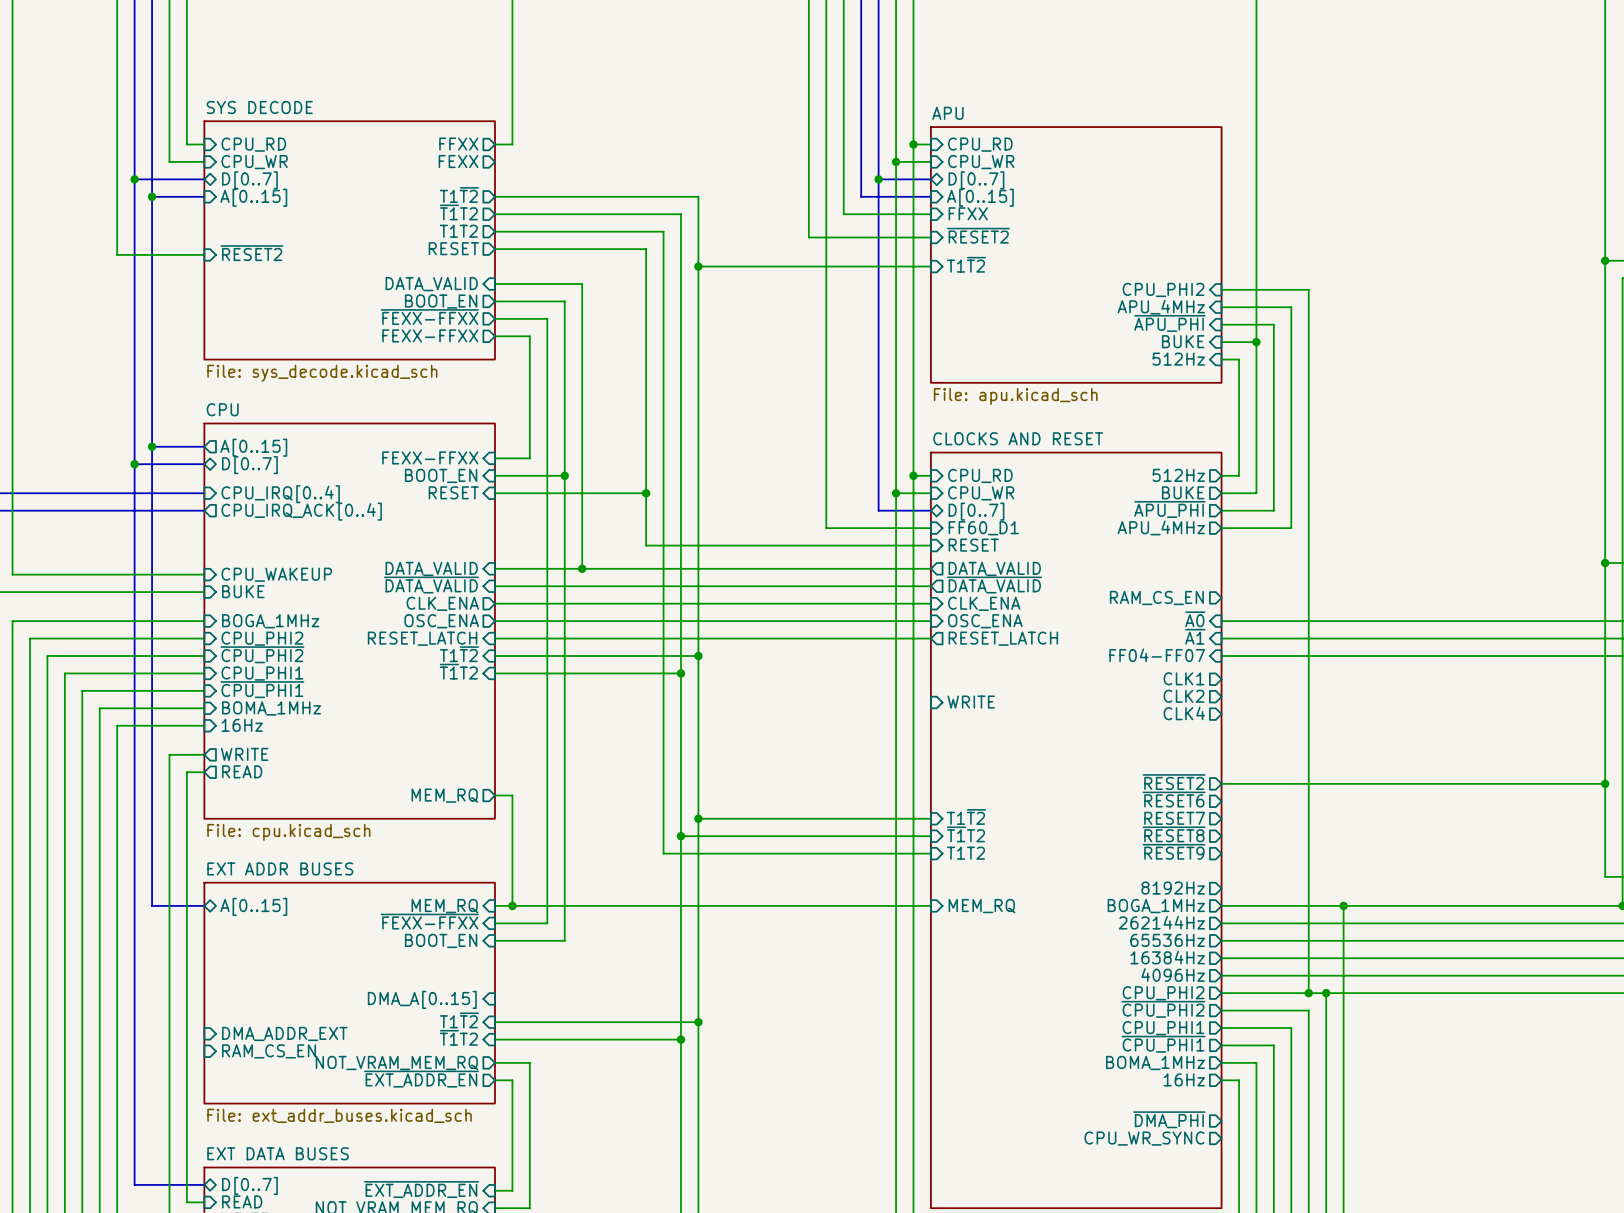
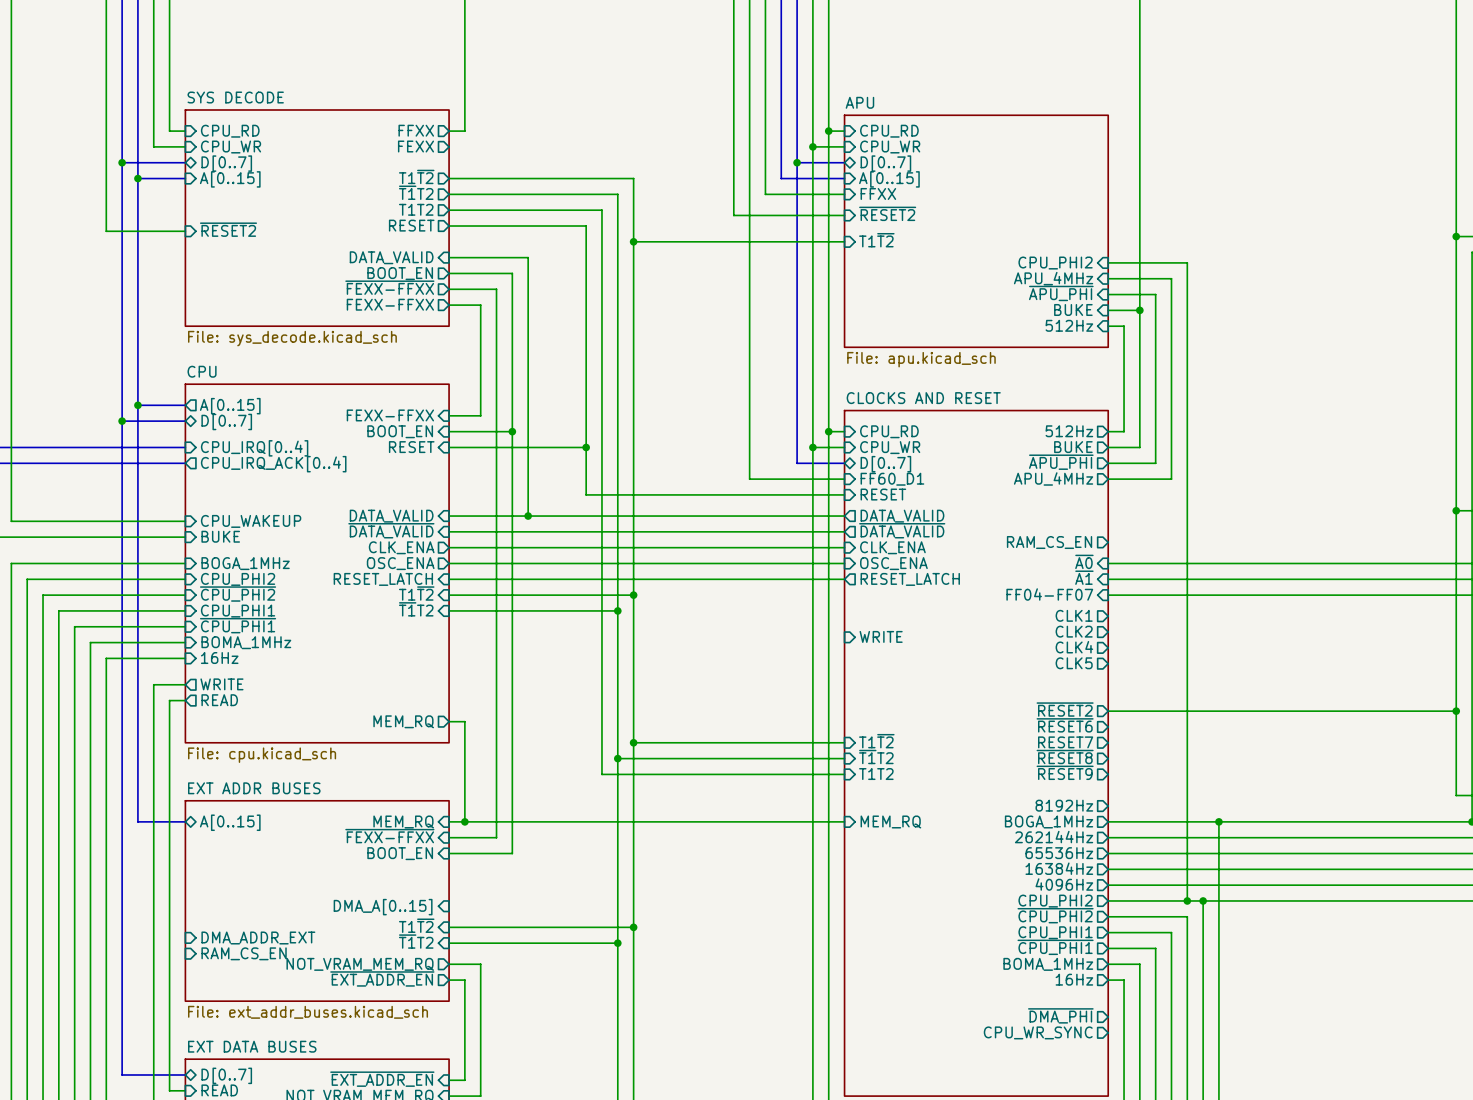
sheet pin: none -> CLK5 (1074, 663)

